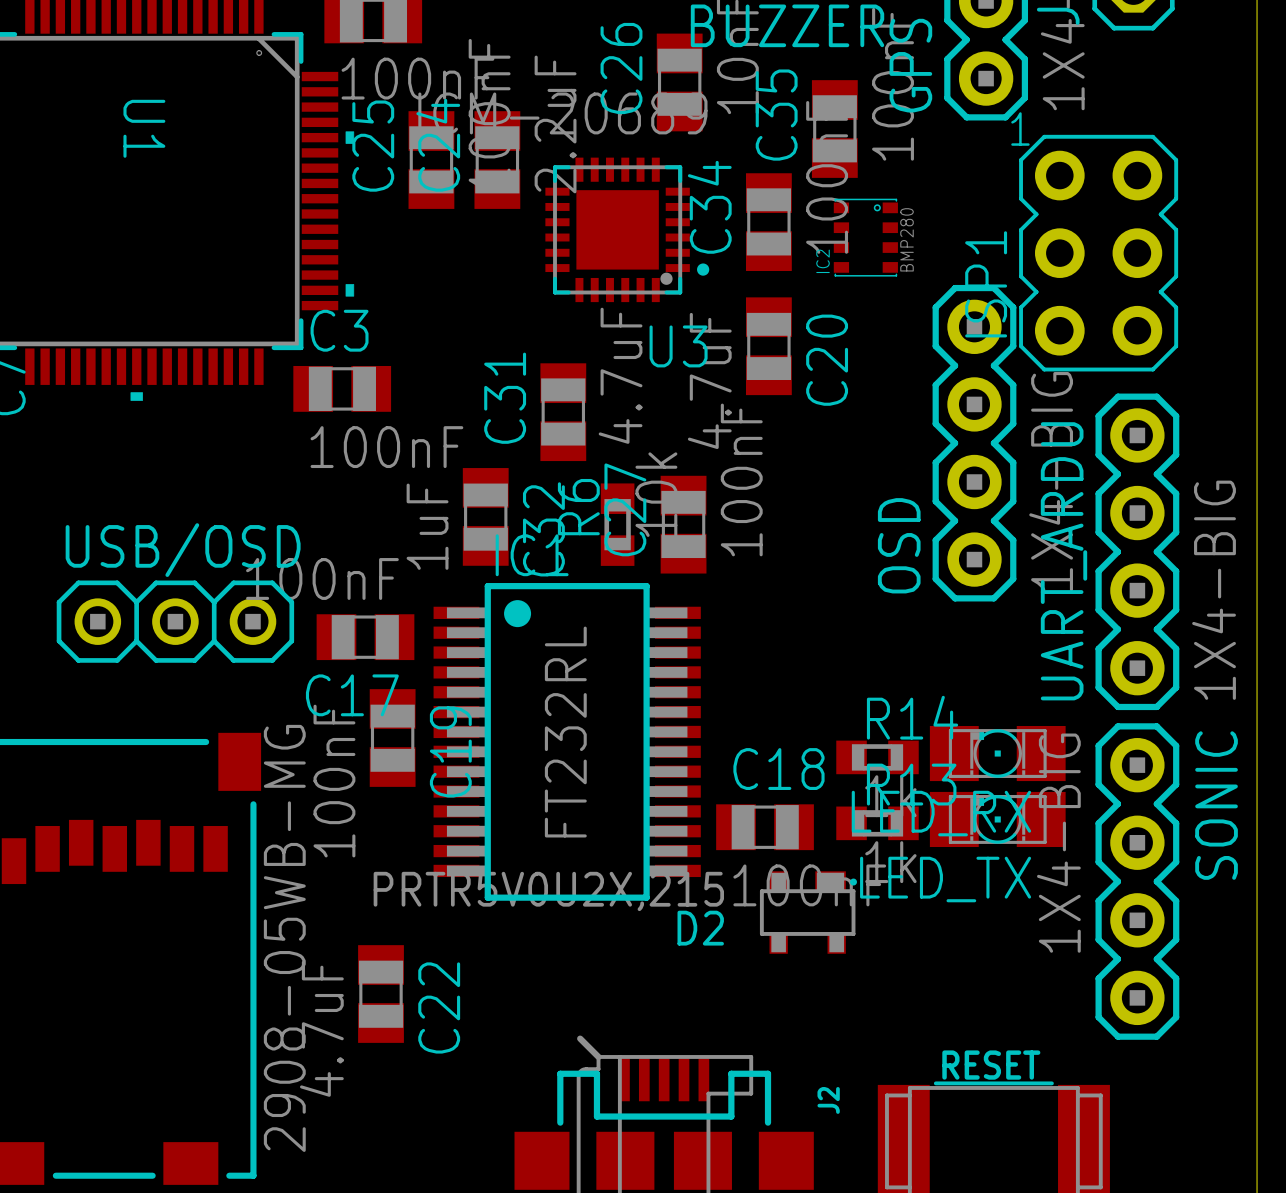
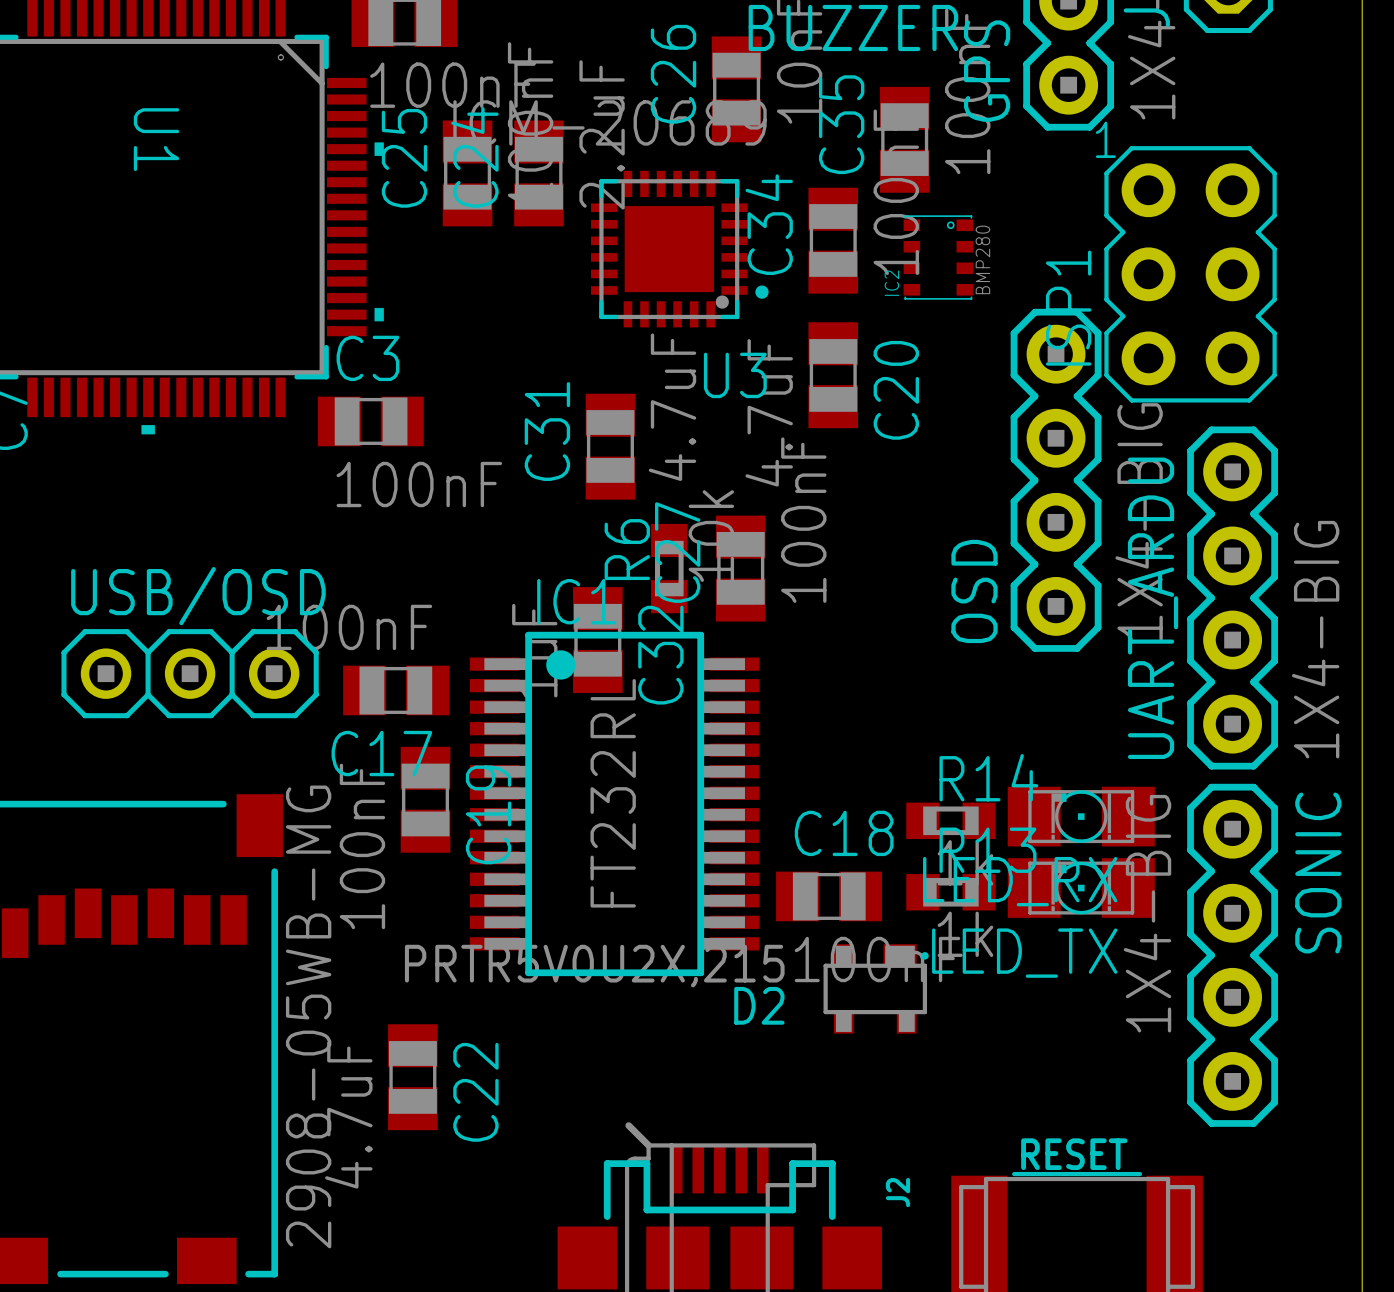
C32 position: (485, 516) -> (597, 640)

